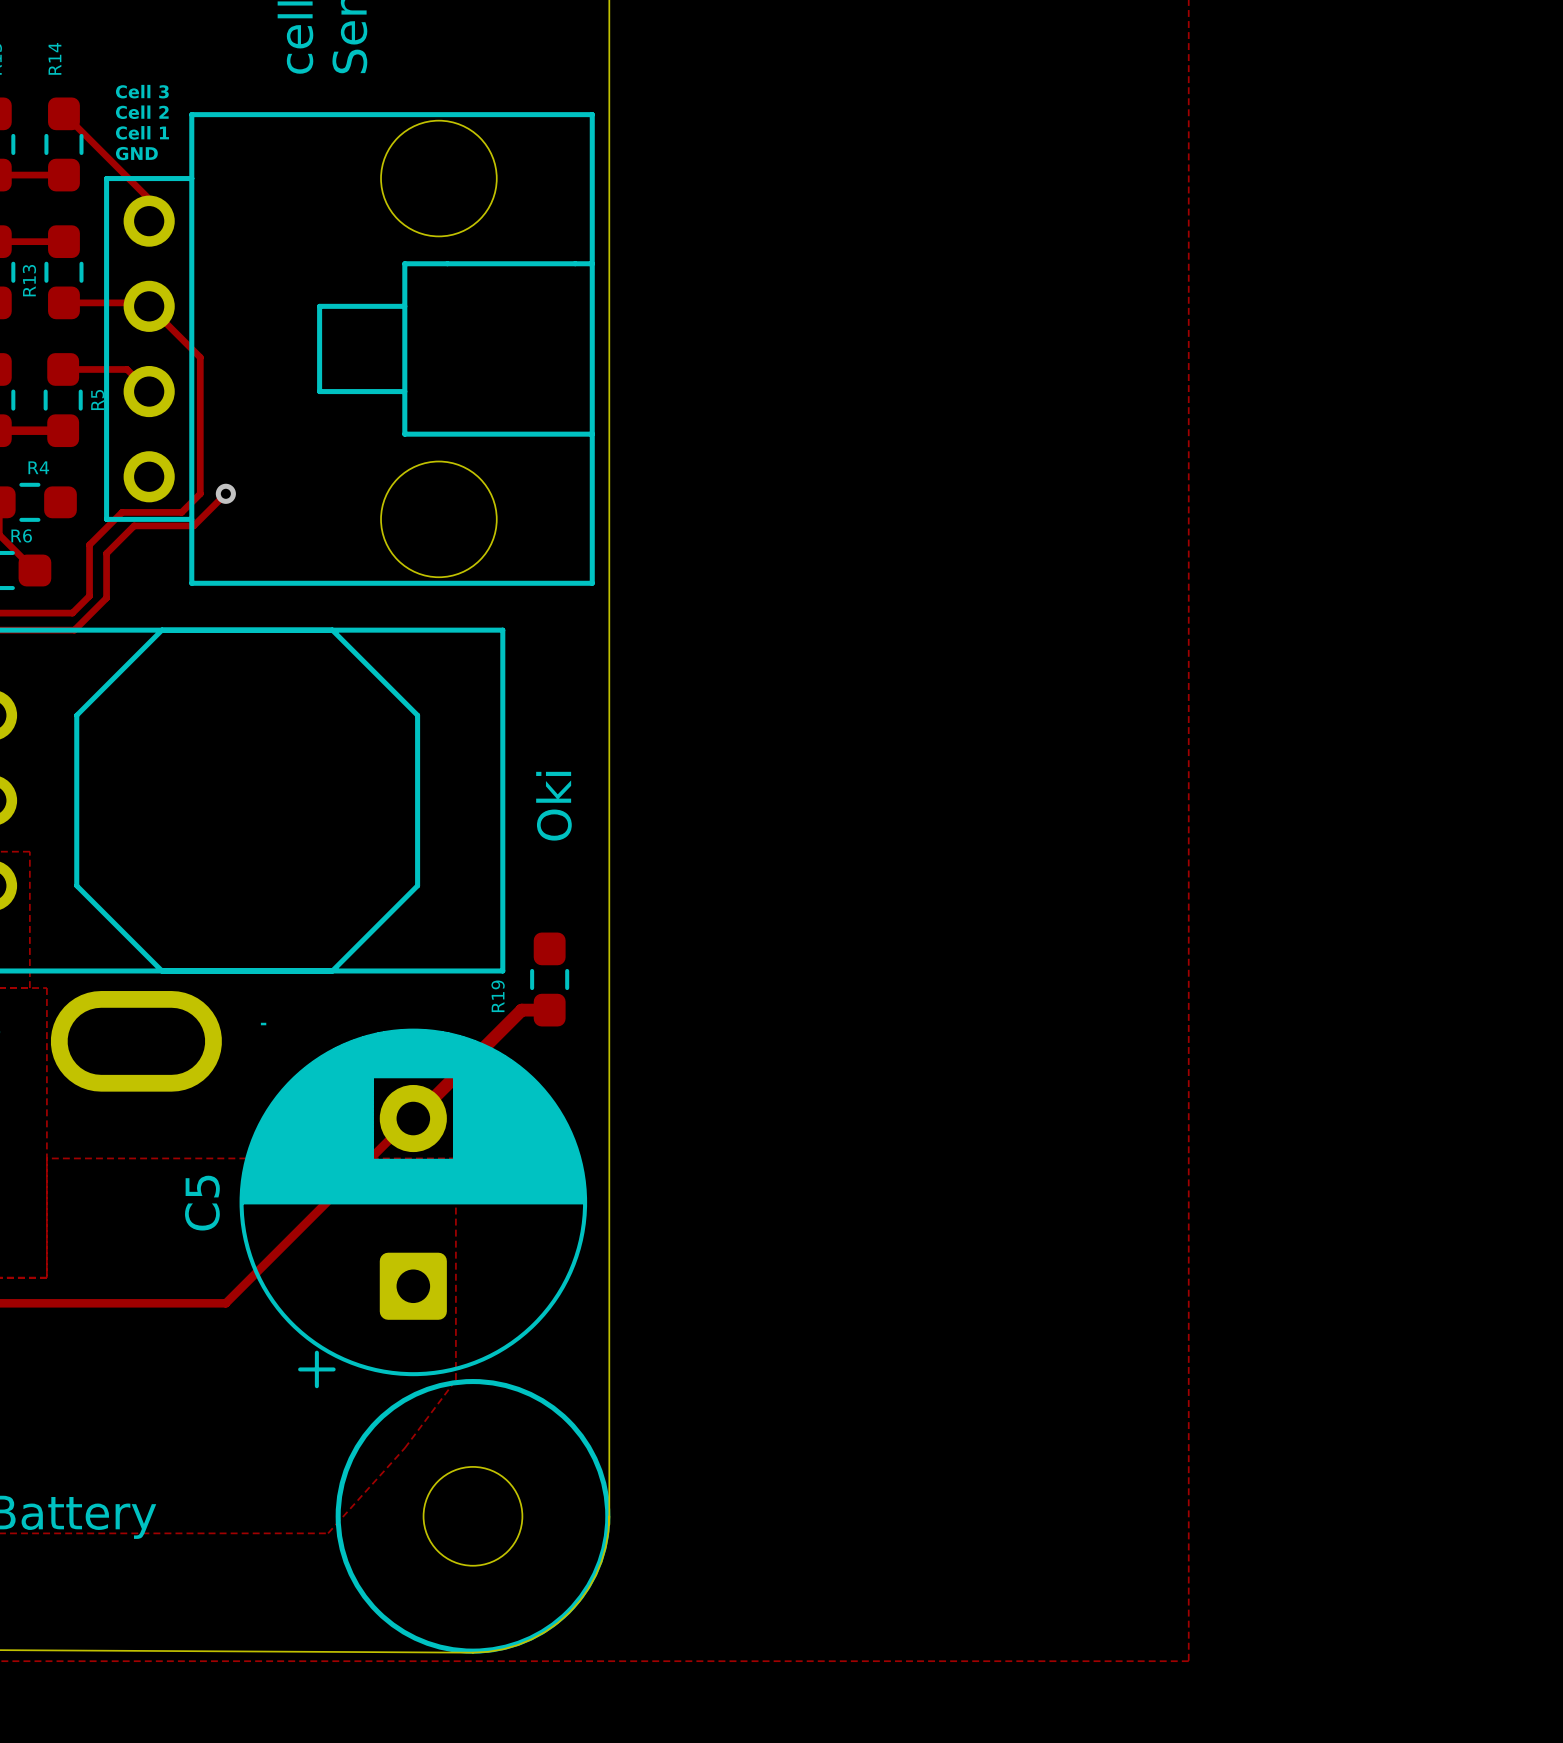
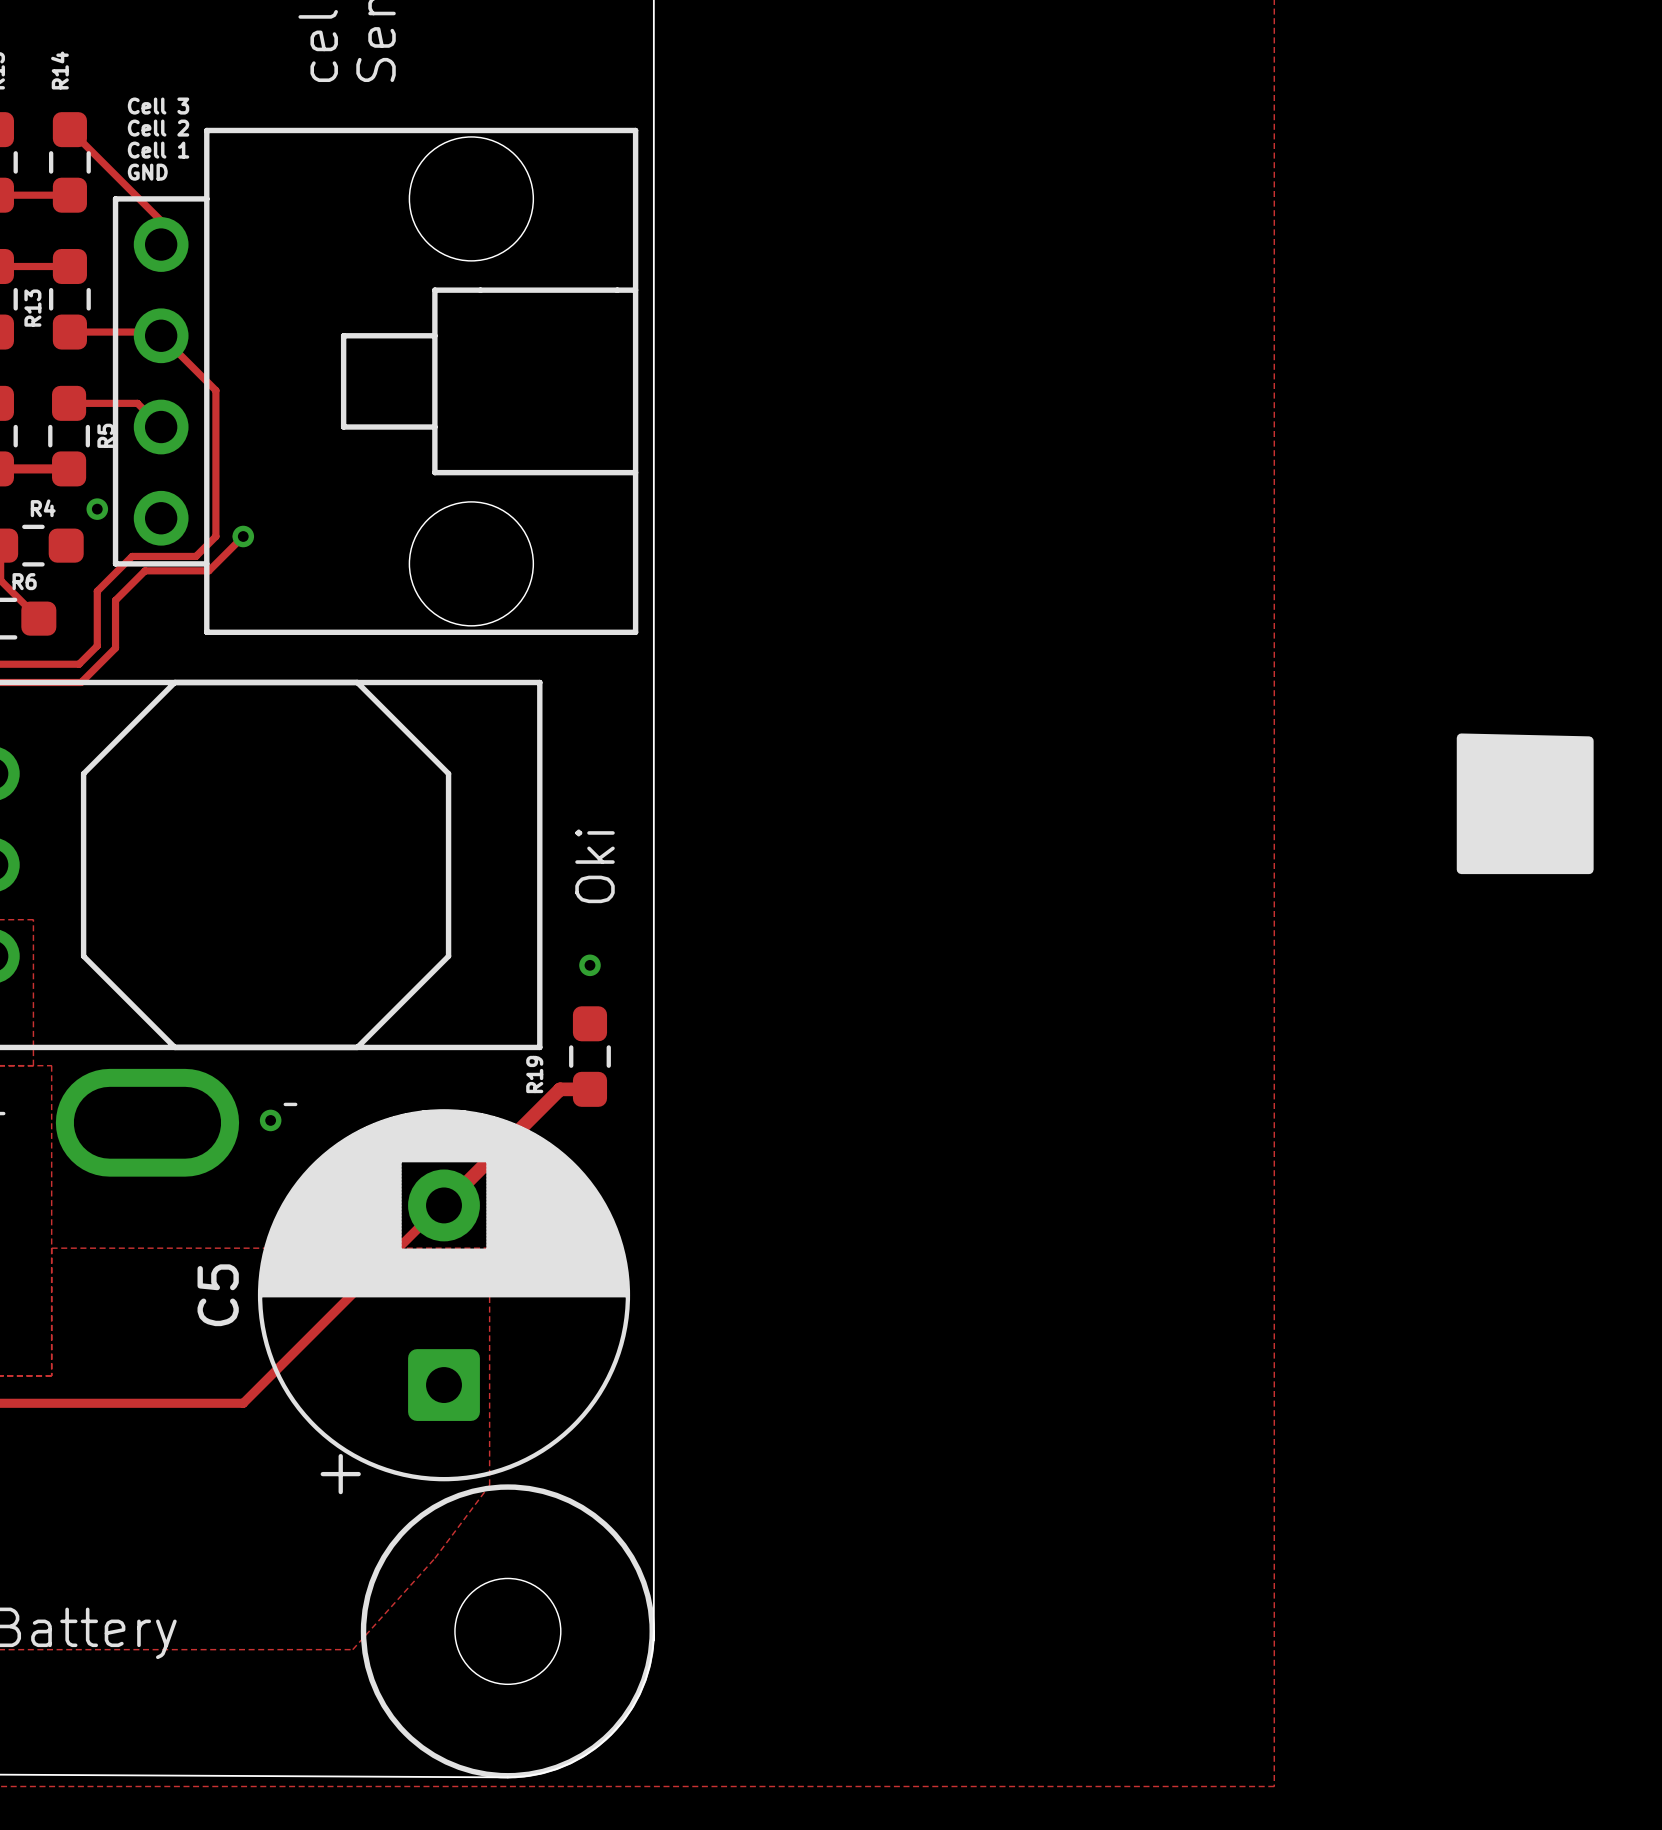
via: none -> (97, 509)
drawing: none -> [1456, 733, 1594, 875]
via: none -> (589, 965)
via: none -> (270, 1120)

